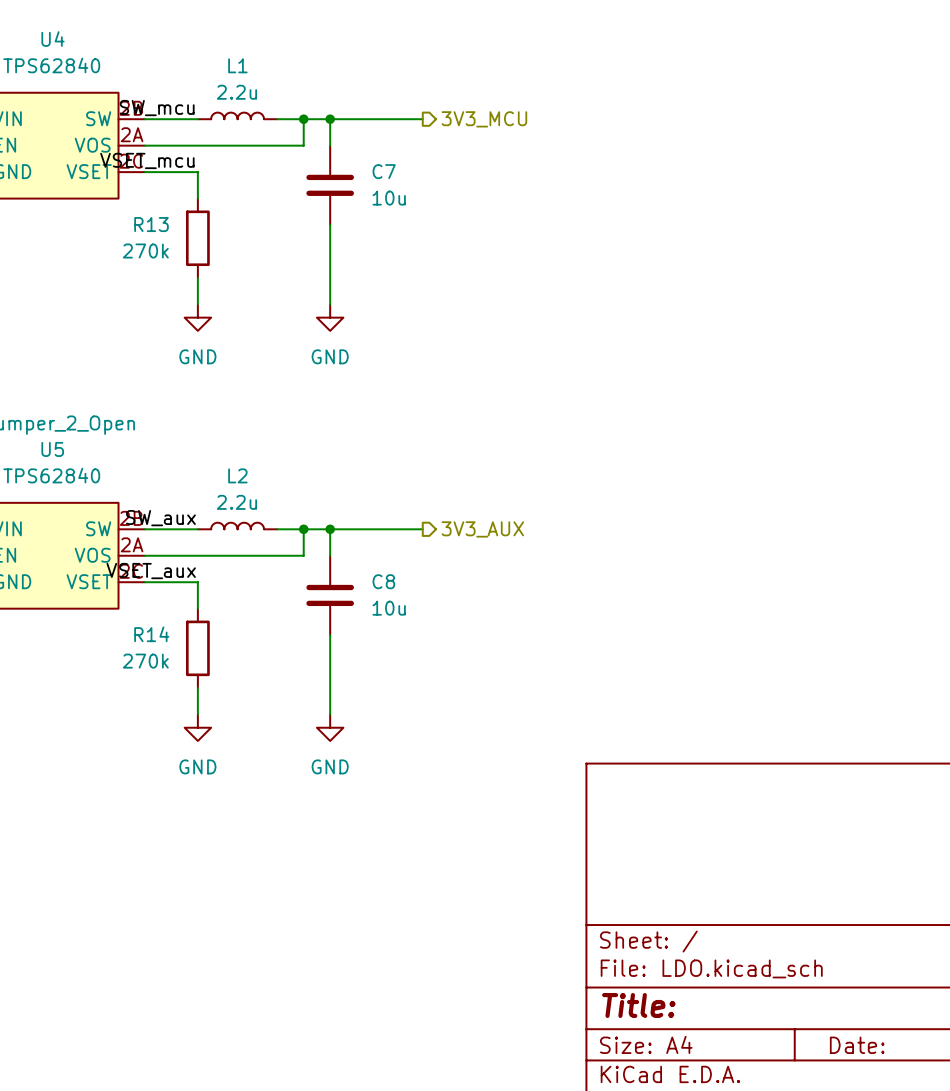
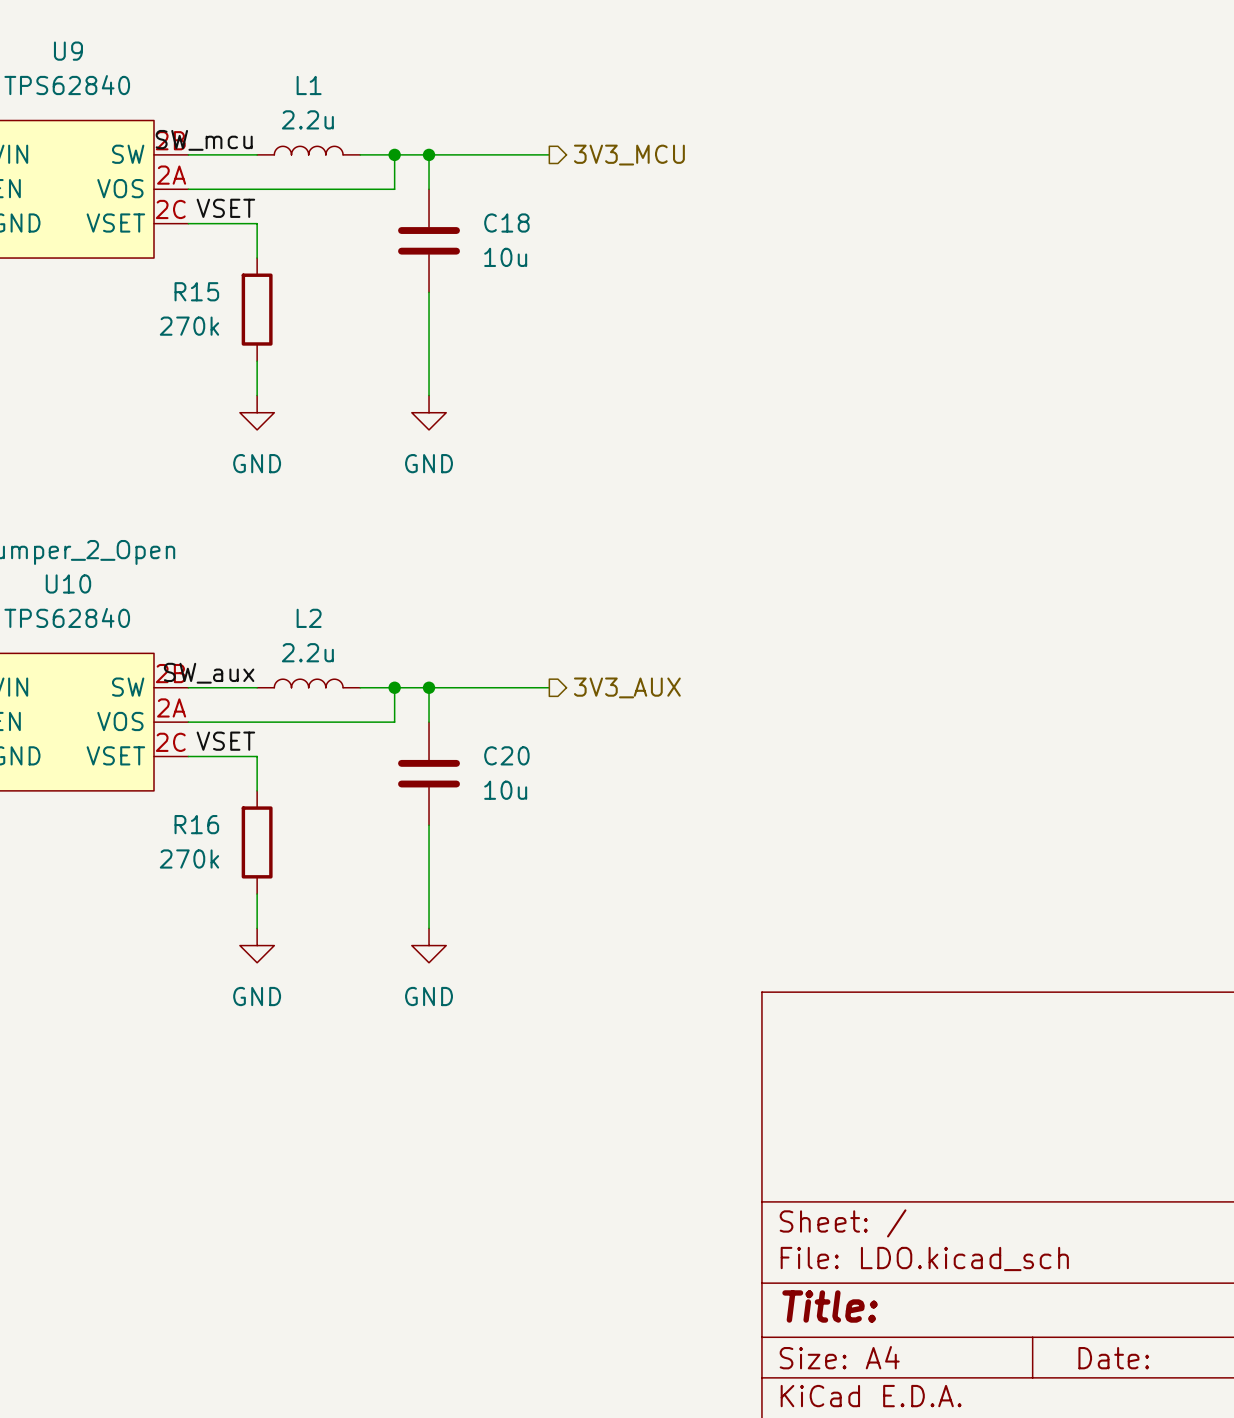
U4 name: U4 (53, 39) -> U9 (68, 51)
label: VSET_mcu (147, 160) -> VSET (225, 208)
C7 name: C7 (384, 171) -> C18 (506, 223)
R13 name: R13 (151, 224) -> R15 (196, 291)
U5 name: U5 (52, 449) -> U10 (68, 583)
label: VSET_aux (151, 571) -> VSET (225, 741)
C8 name: C8 (383, 581) -> C20 (506, 755)
R14 name: R14 (151, 634) -> R16 (196, 824)

